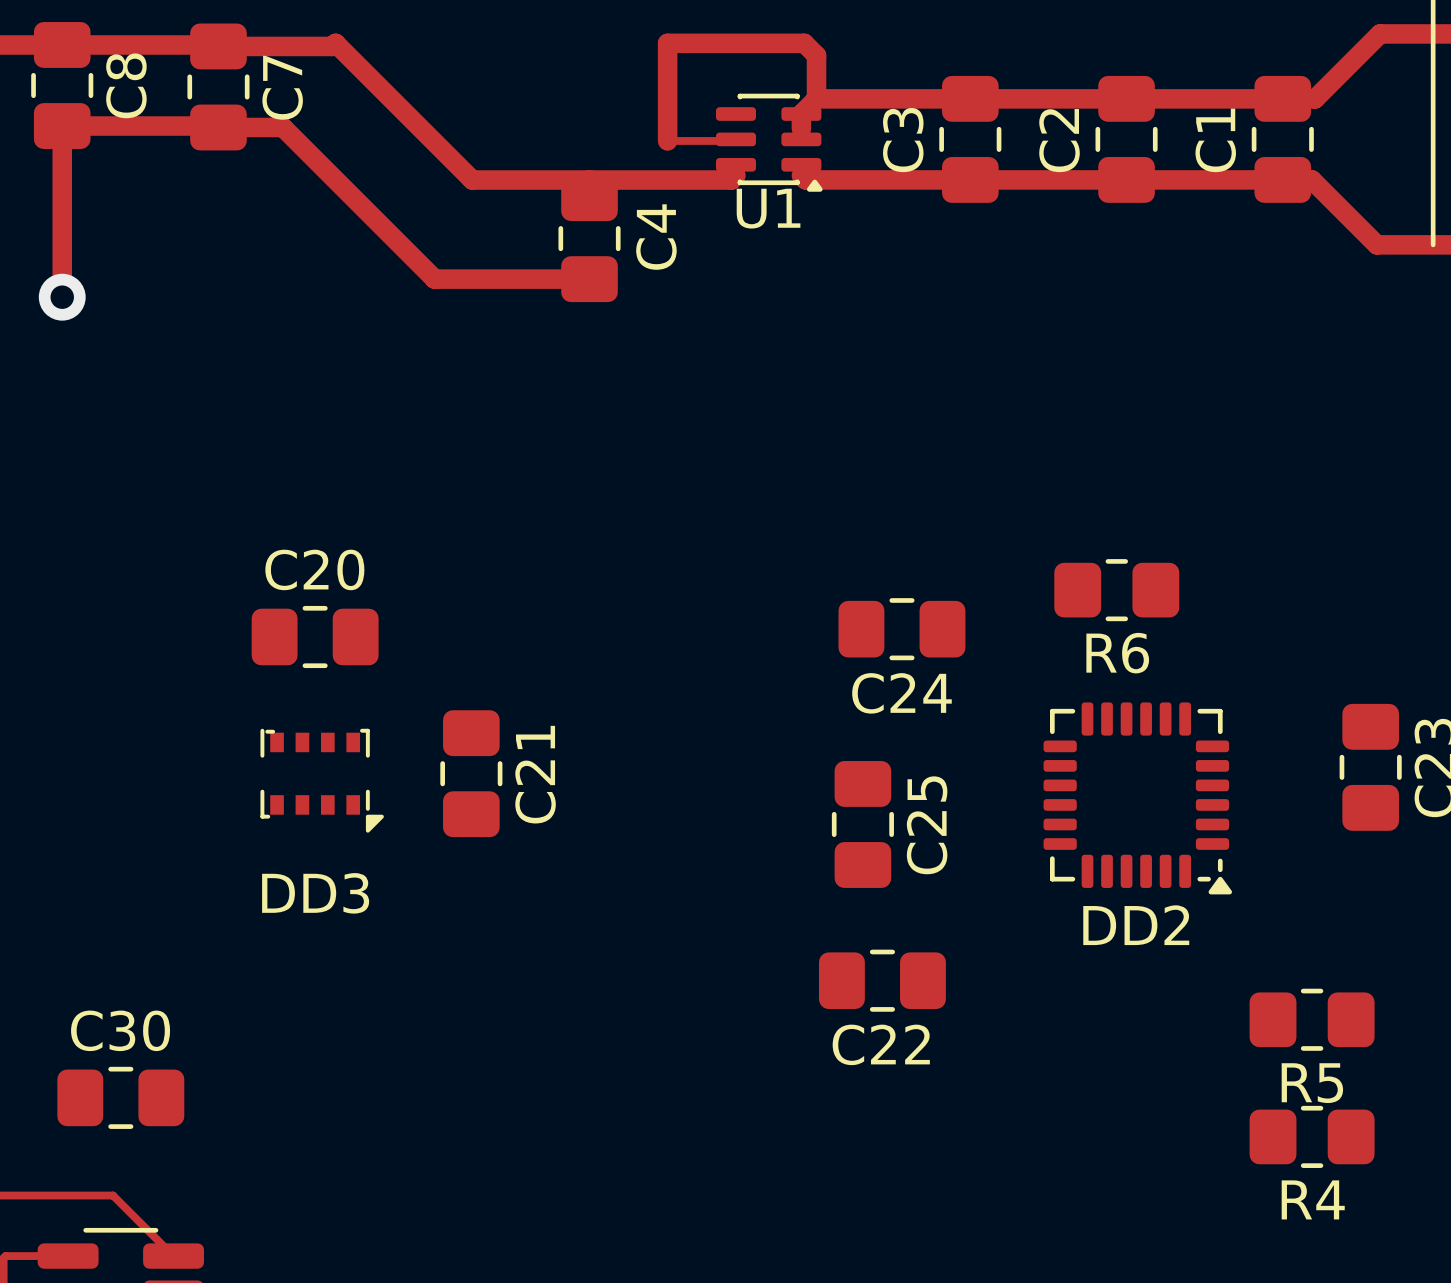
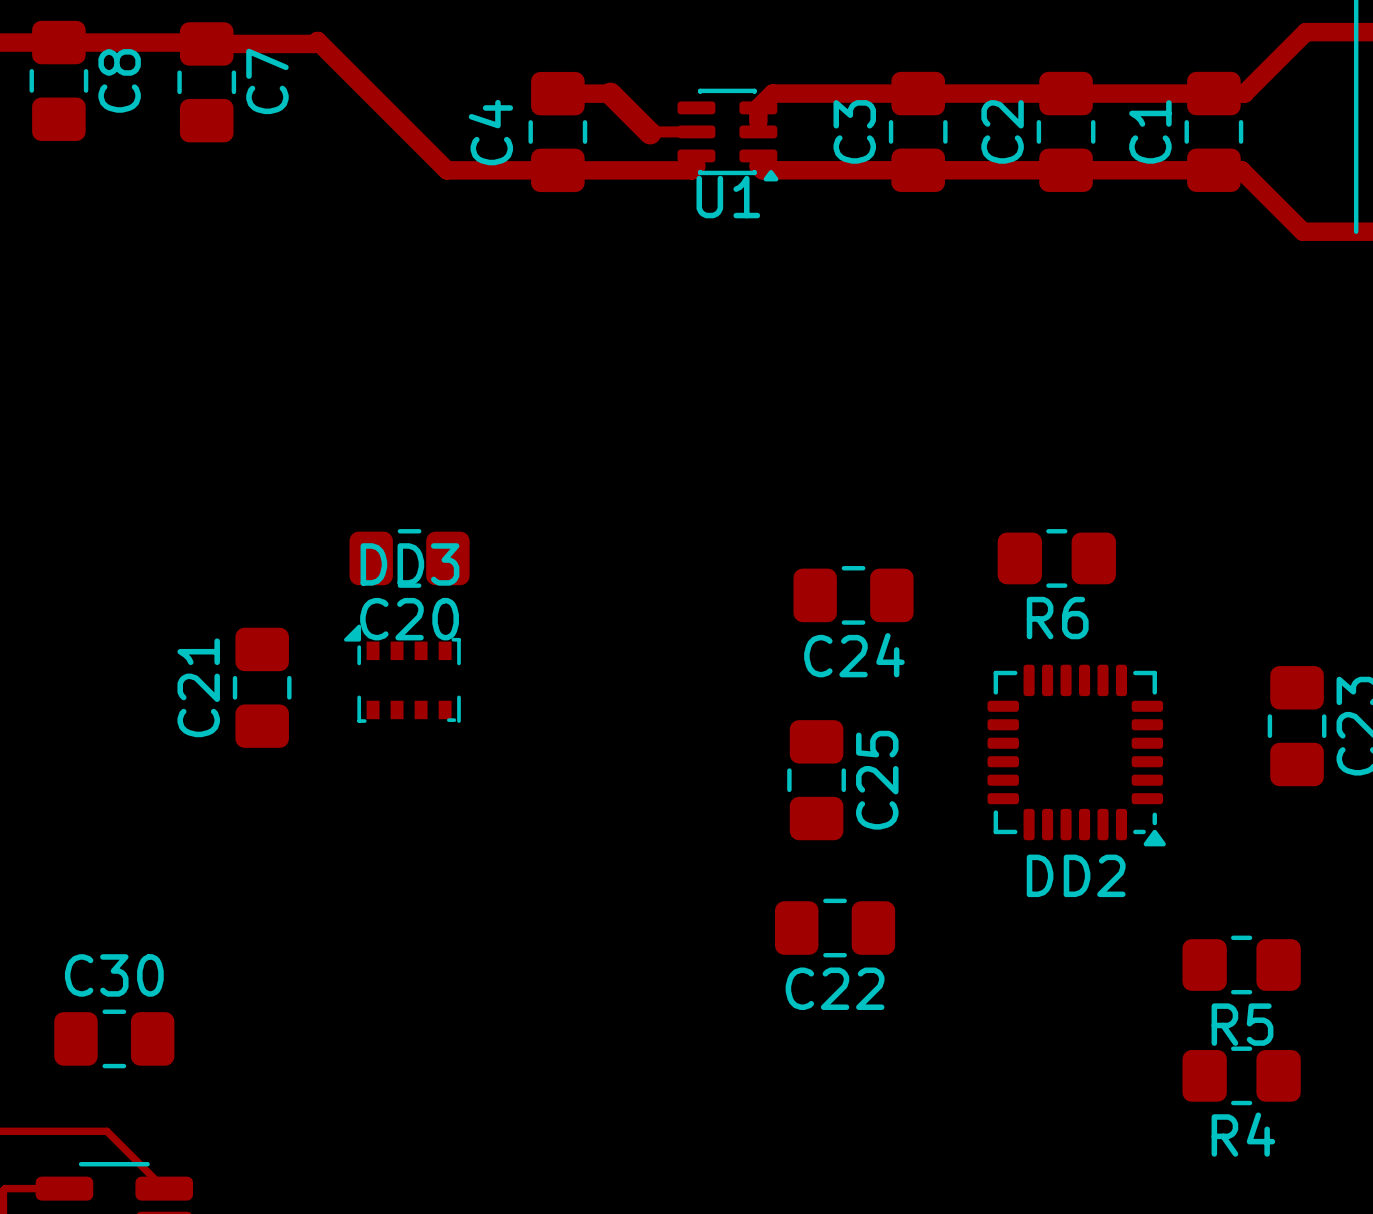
top track: none -> (557, 93) (610, 93) (650, 133) (705, 131)
top track: (816, 98) (816, 55) (804, 43) (667, 43) (667, 140) (726, 140) -> none
C4 name position: C4 (656, 237) -> C4 (490, 132)
C4 position: (589, 238) -> (557, 132)
top track: (589, 279) (434, 279) (283, 127) (62, 126) (62, 297) -> none
via: (62, 297) -> none
C20 name position: C20 (314, 569) -> C20 (409, 619)
C20 position: (315, 637) -> (409, 558)
C21 position: (471, 773) -> (262, 687)
C21 name position: C21 (535, 774) -> C21 (198, 687)
DD3 rotation: 0° (322, 780) -> 180° (402, 673)
DD3 position: (322, 780) -> (402, 673)

